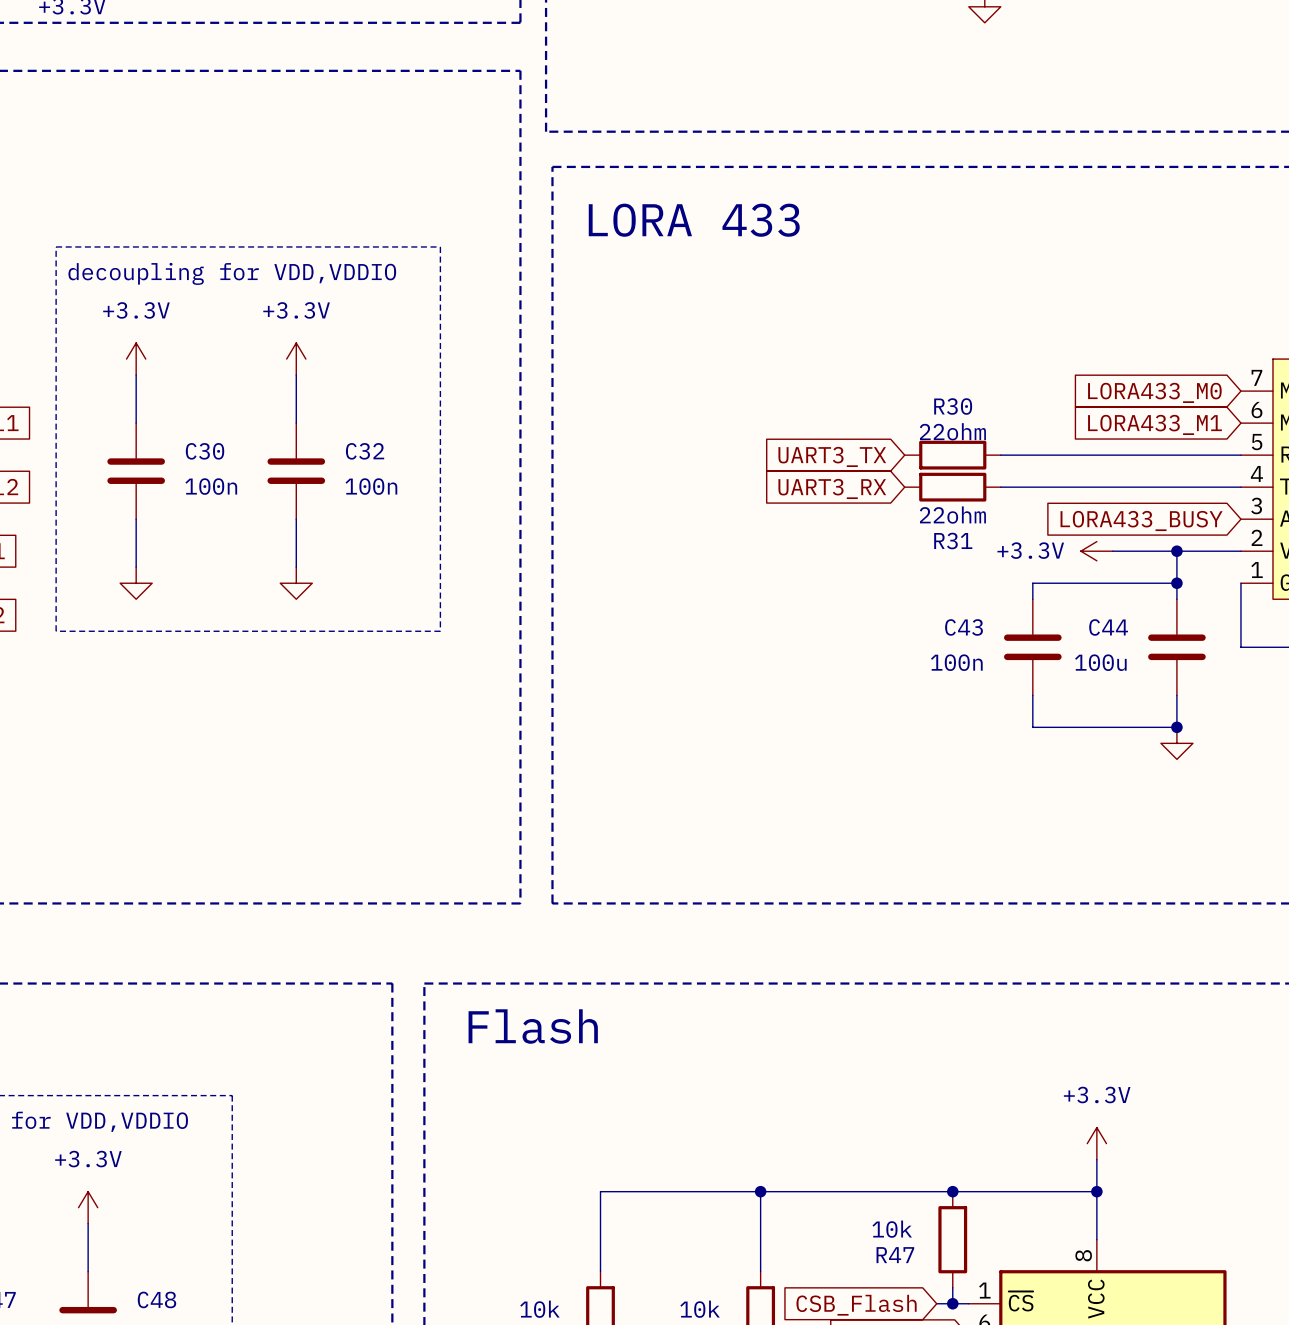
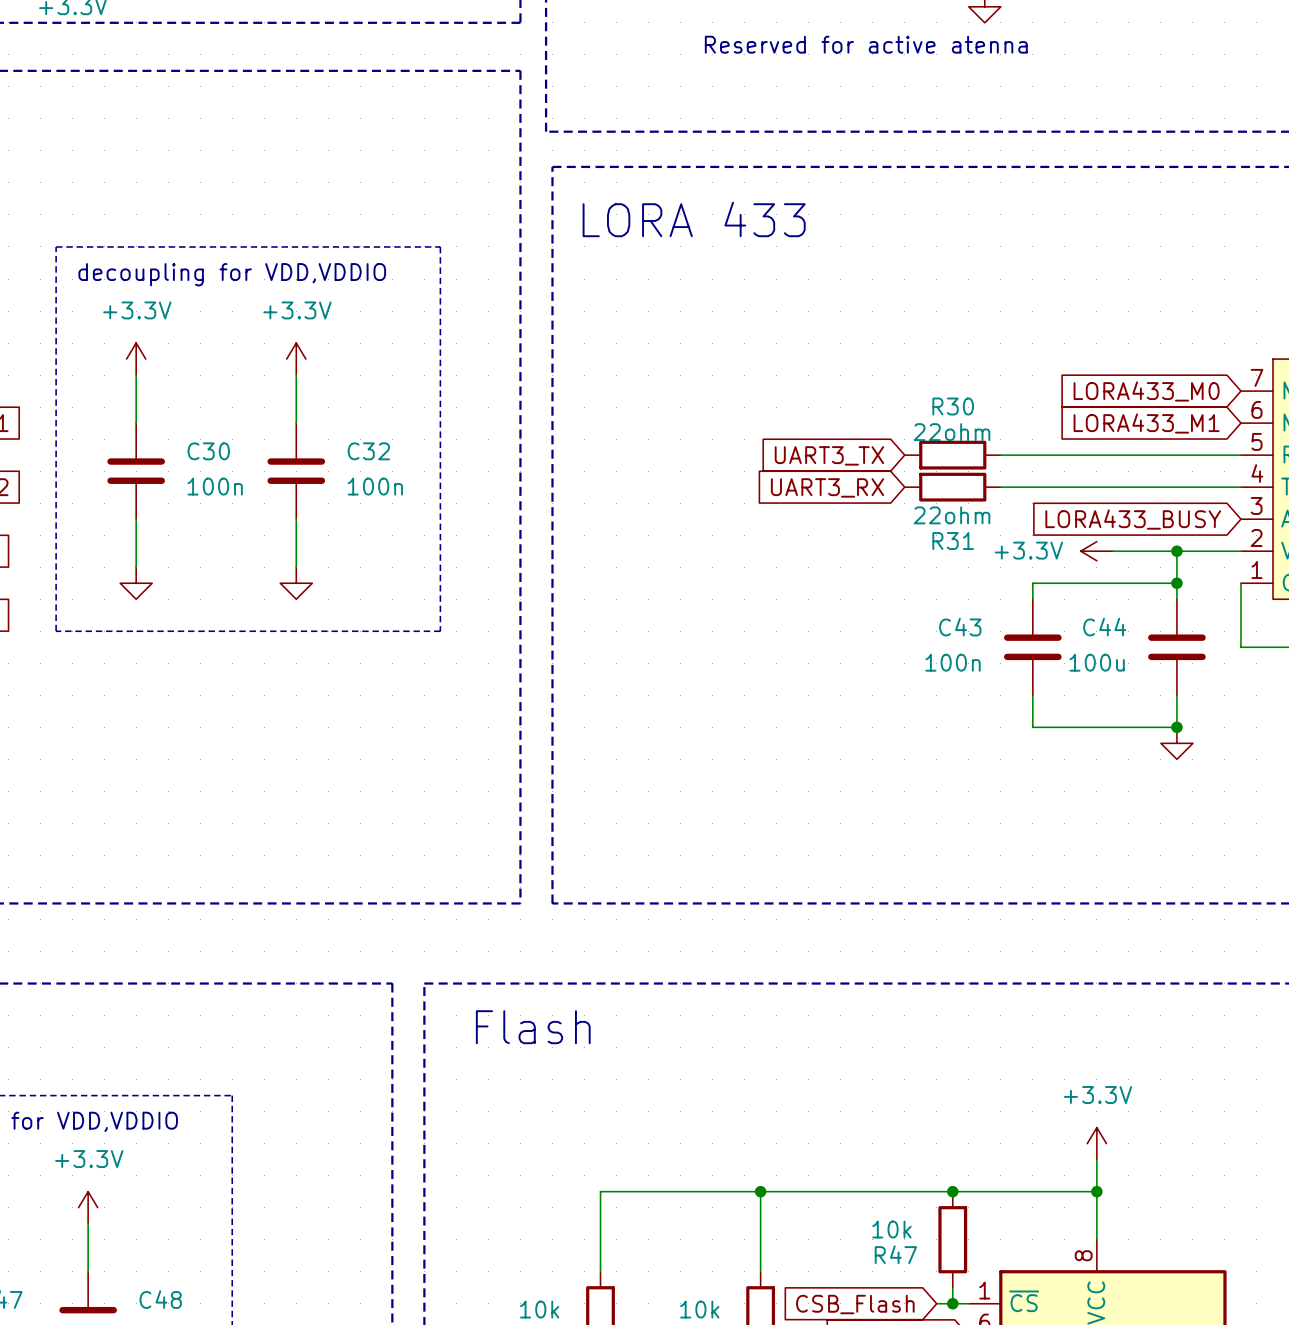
text: none -> Reserved for active atenna (866, 44)

